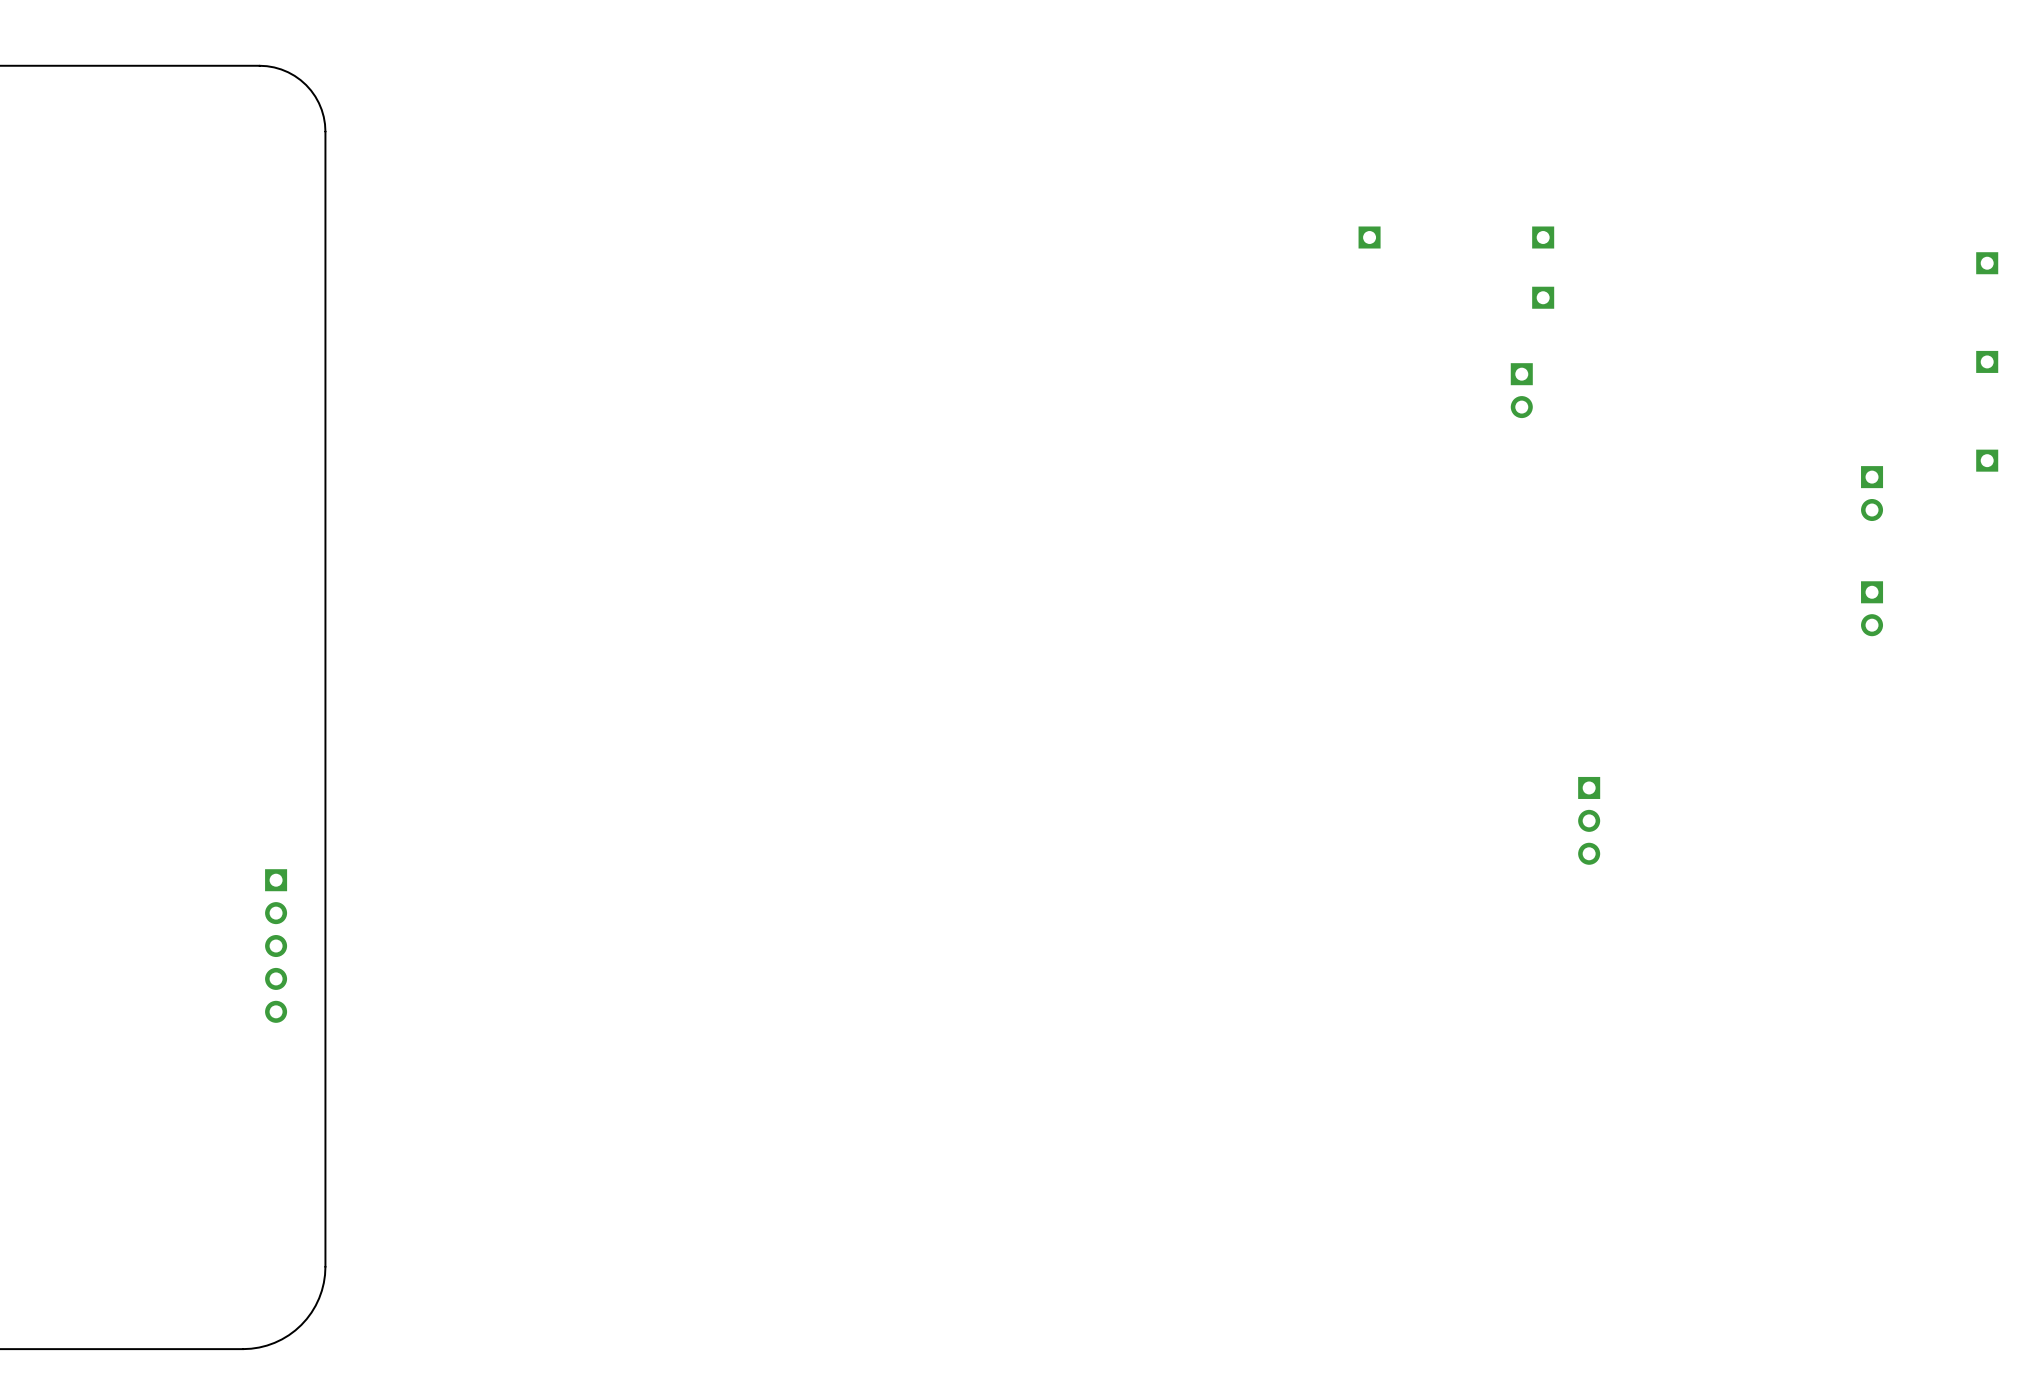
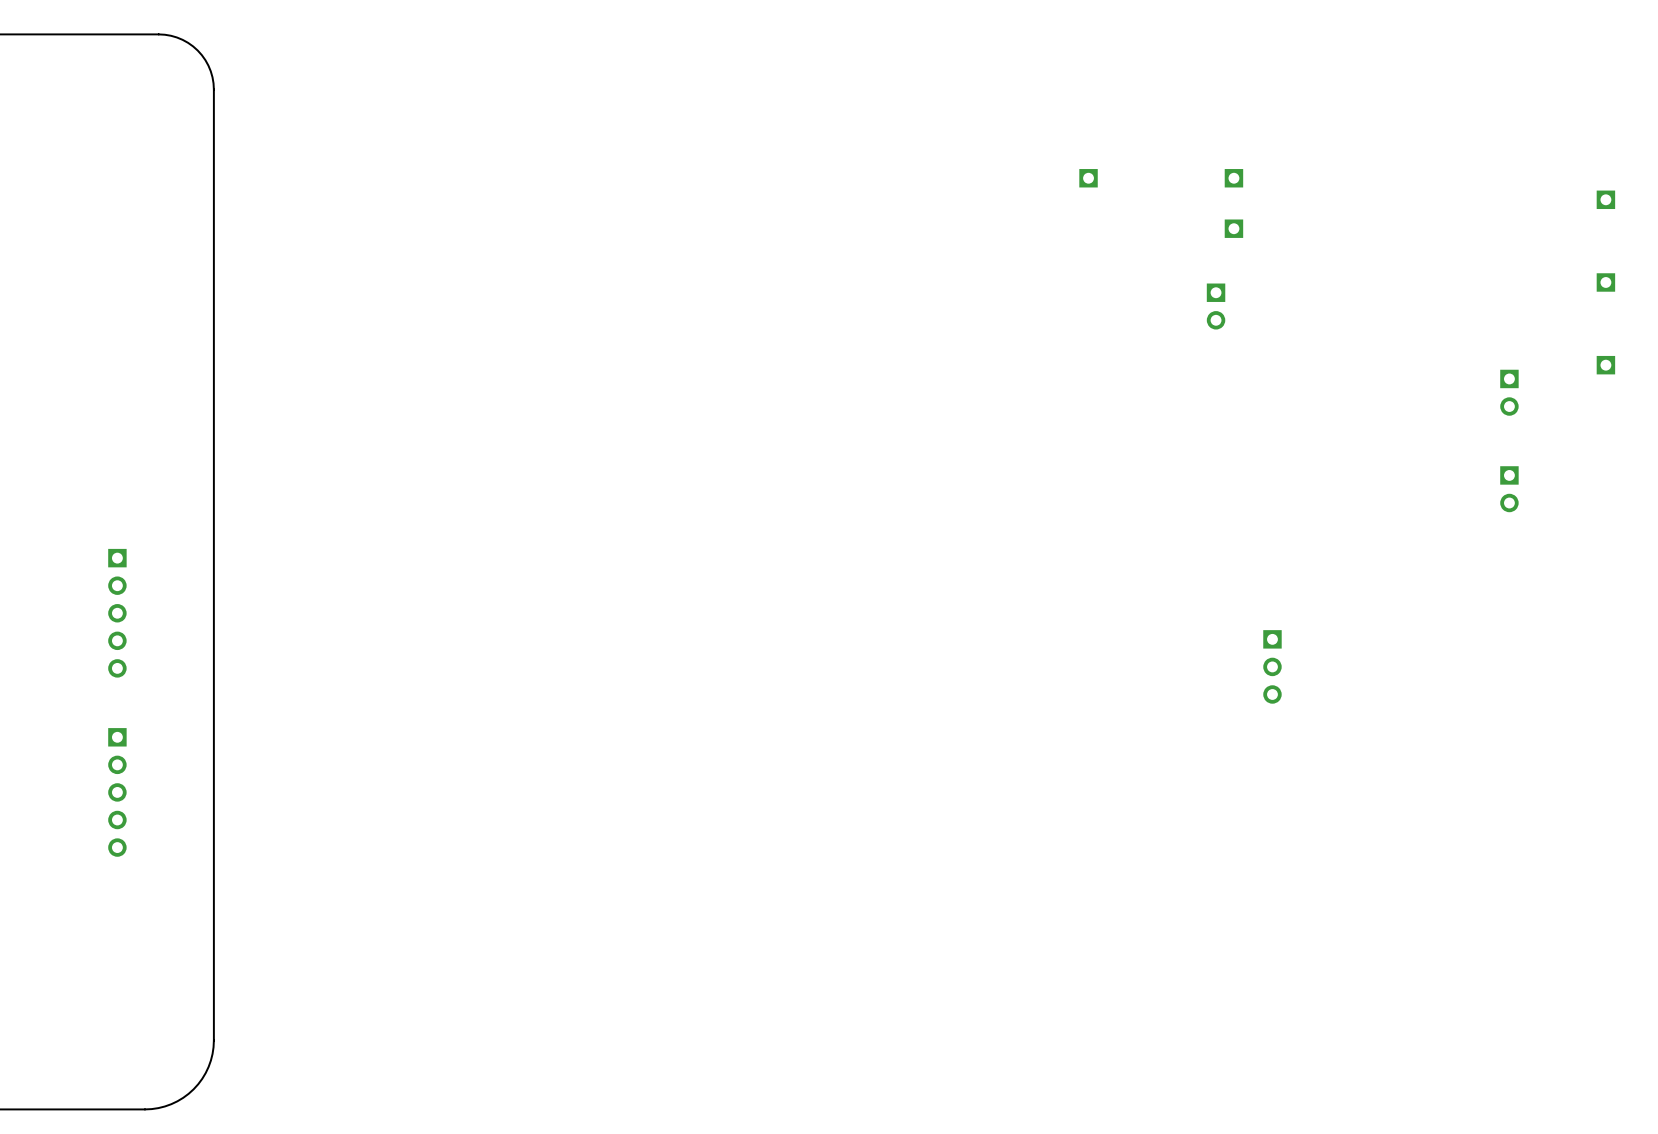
part: none -> (117, 613)
part position: (276, 946) -> (117, 792)

